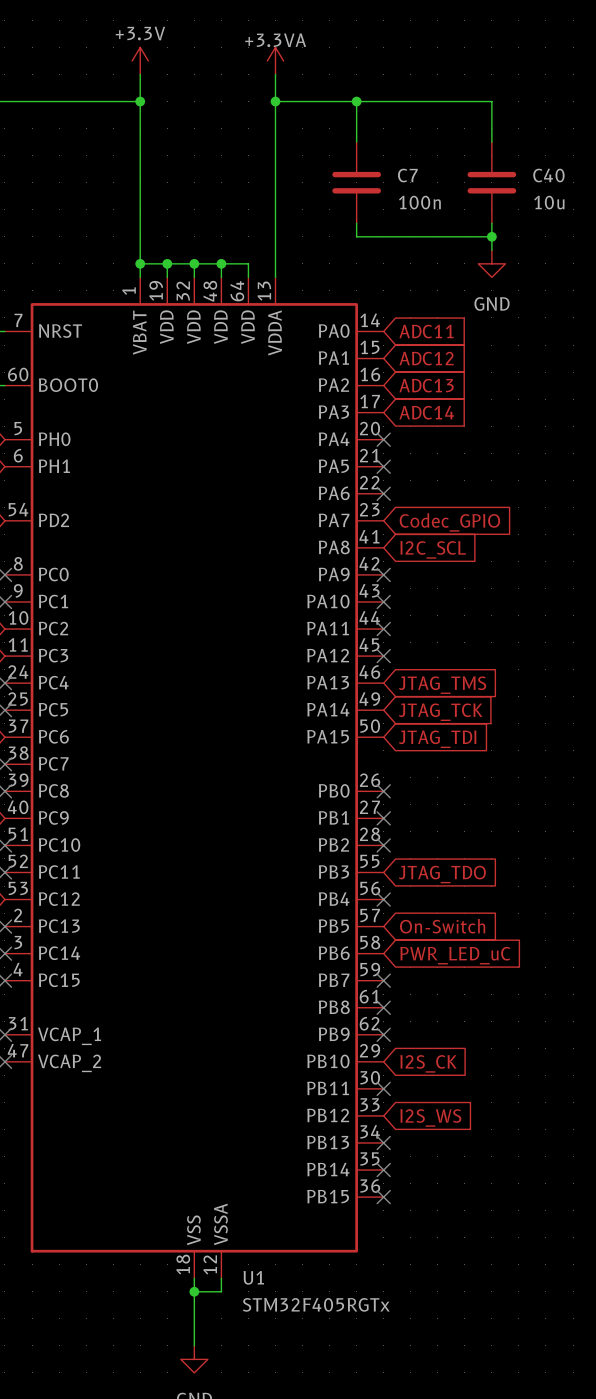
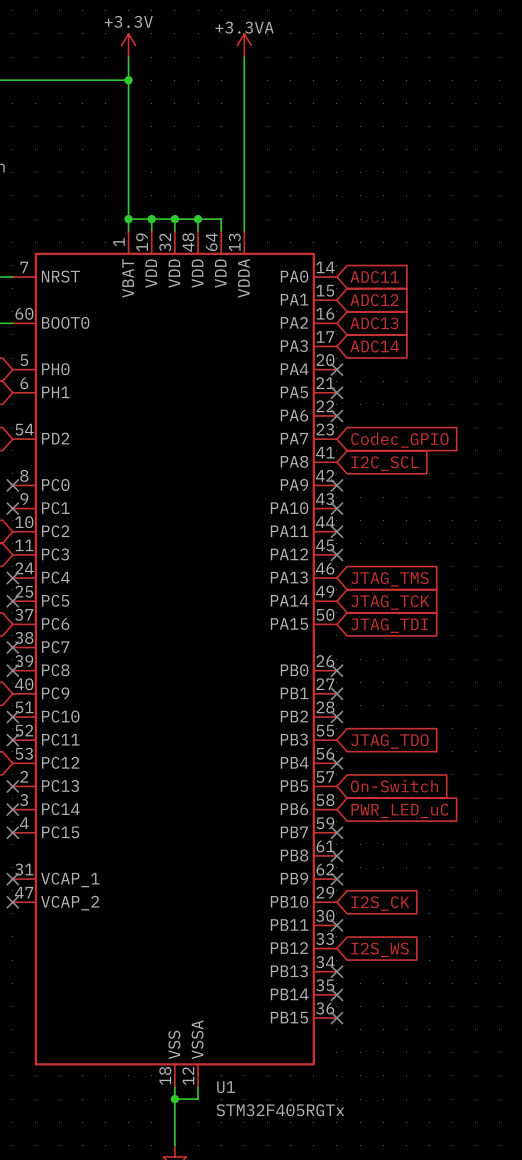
wire: (275, 101) (491, 101) (491, 142) -> none
junction: (275, 101) -> none
wire: (356, 101) (356, 142) -> none
junction: (356, 101) -> none
C7: 100n (356, 182) -> none
C40: 10u (491, 182) -> none
wire: (356, 223) (356, 236) (491, 236) -> none
wire: (491, 223) (491, 250) -> none
junction: (491, 236) -> none
power symbol: GND (491, 263) -> none

